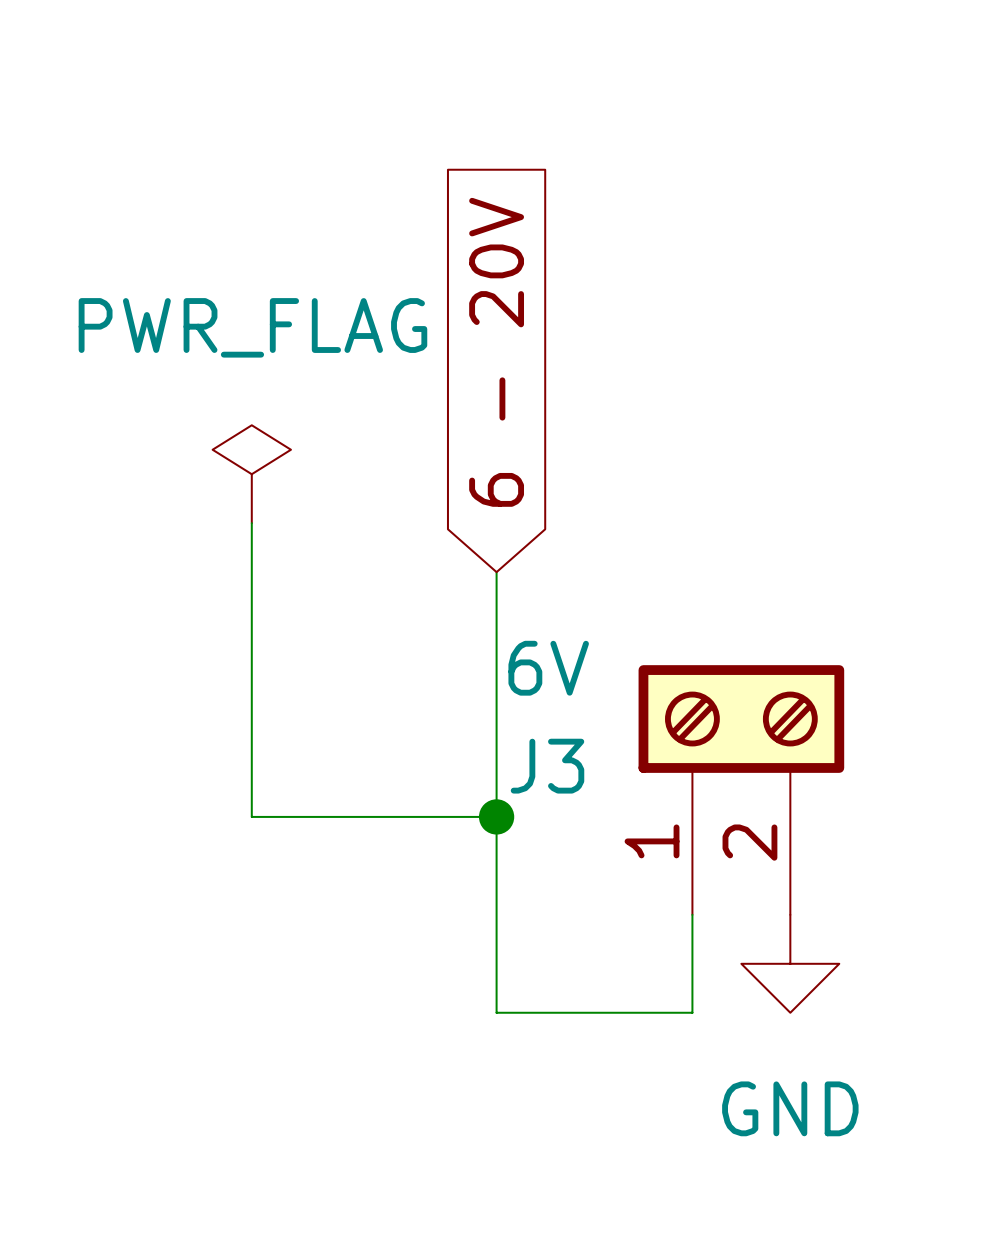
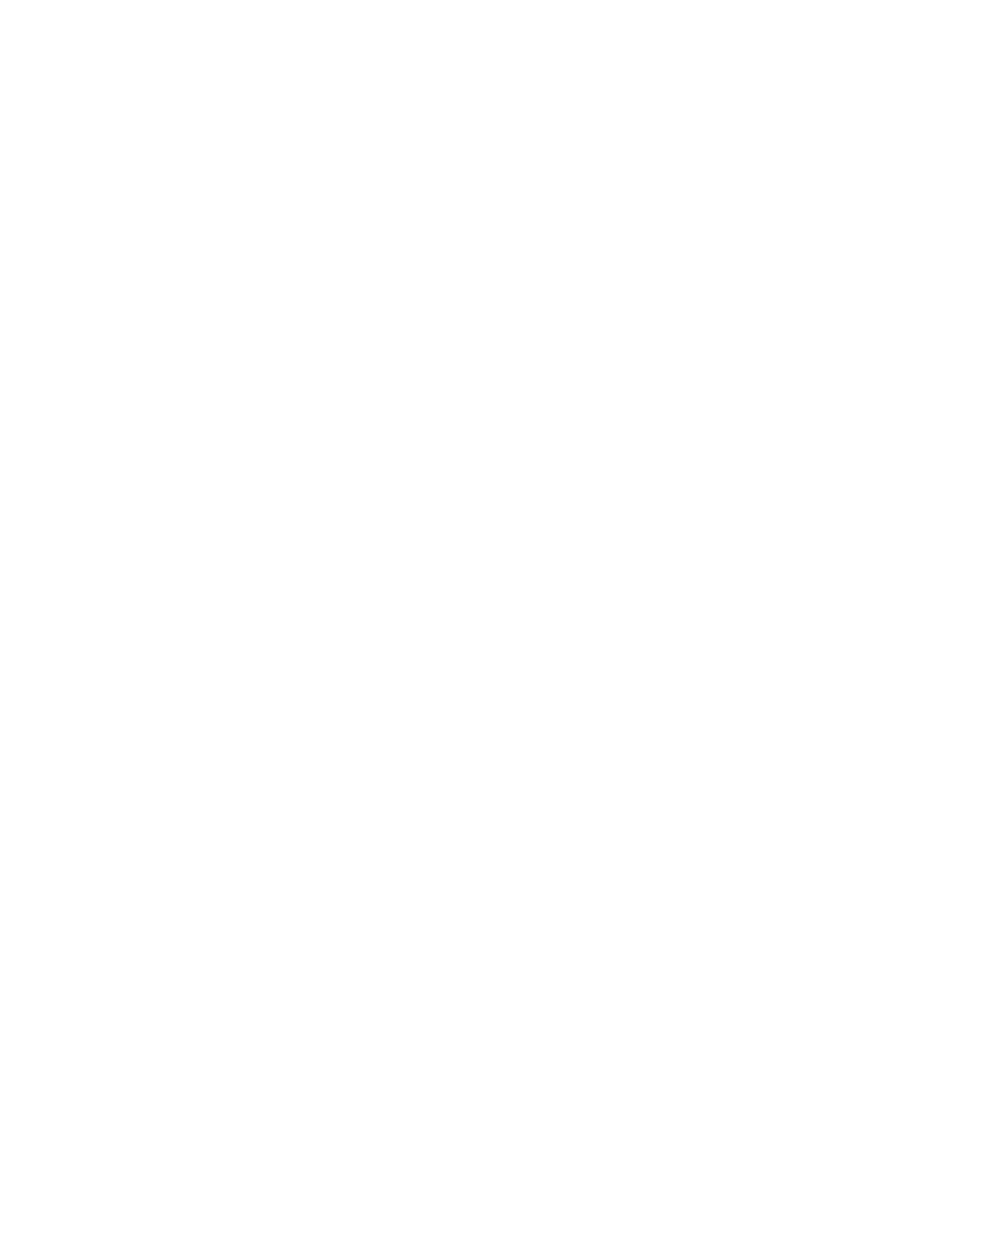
global label: 6 - 20V (496, 352) -> none
power symbol: PWR_FLAG (251, 474) -> none
wire: (251, 523) (251, 816) (496, 816) -> none
wire: (496, 572) (496, 1012) (692, 1012) (692, 914) -> none
J3: 6V (741, 790) -> none
junction: (496, 816) -> none
power symbol: GND (790, 963) -> none

